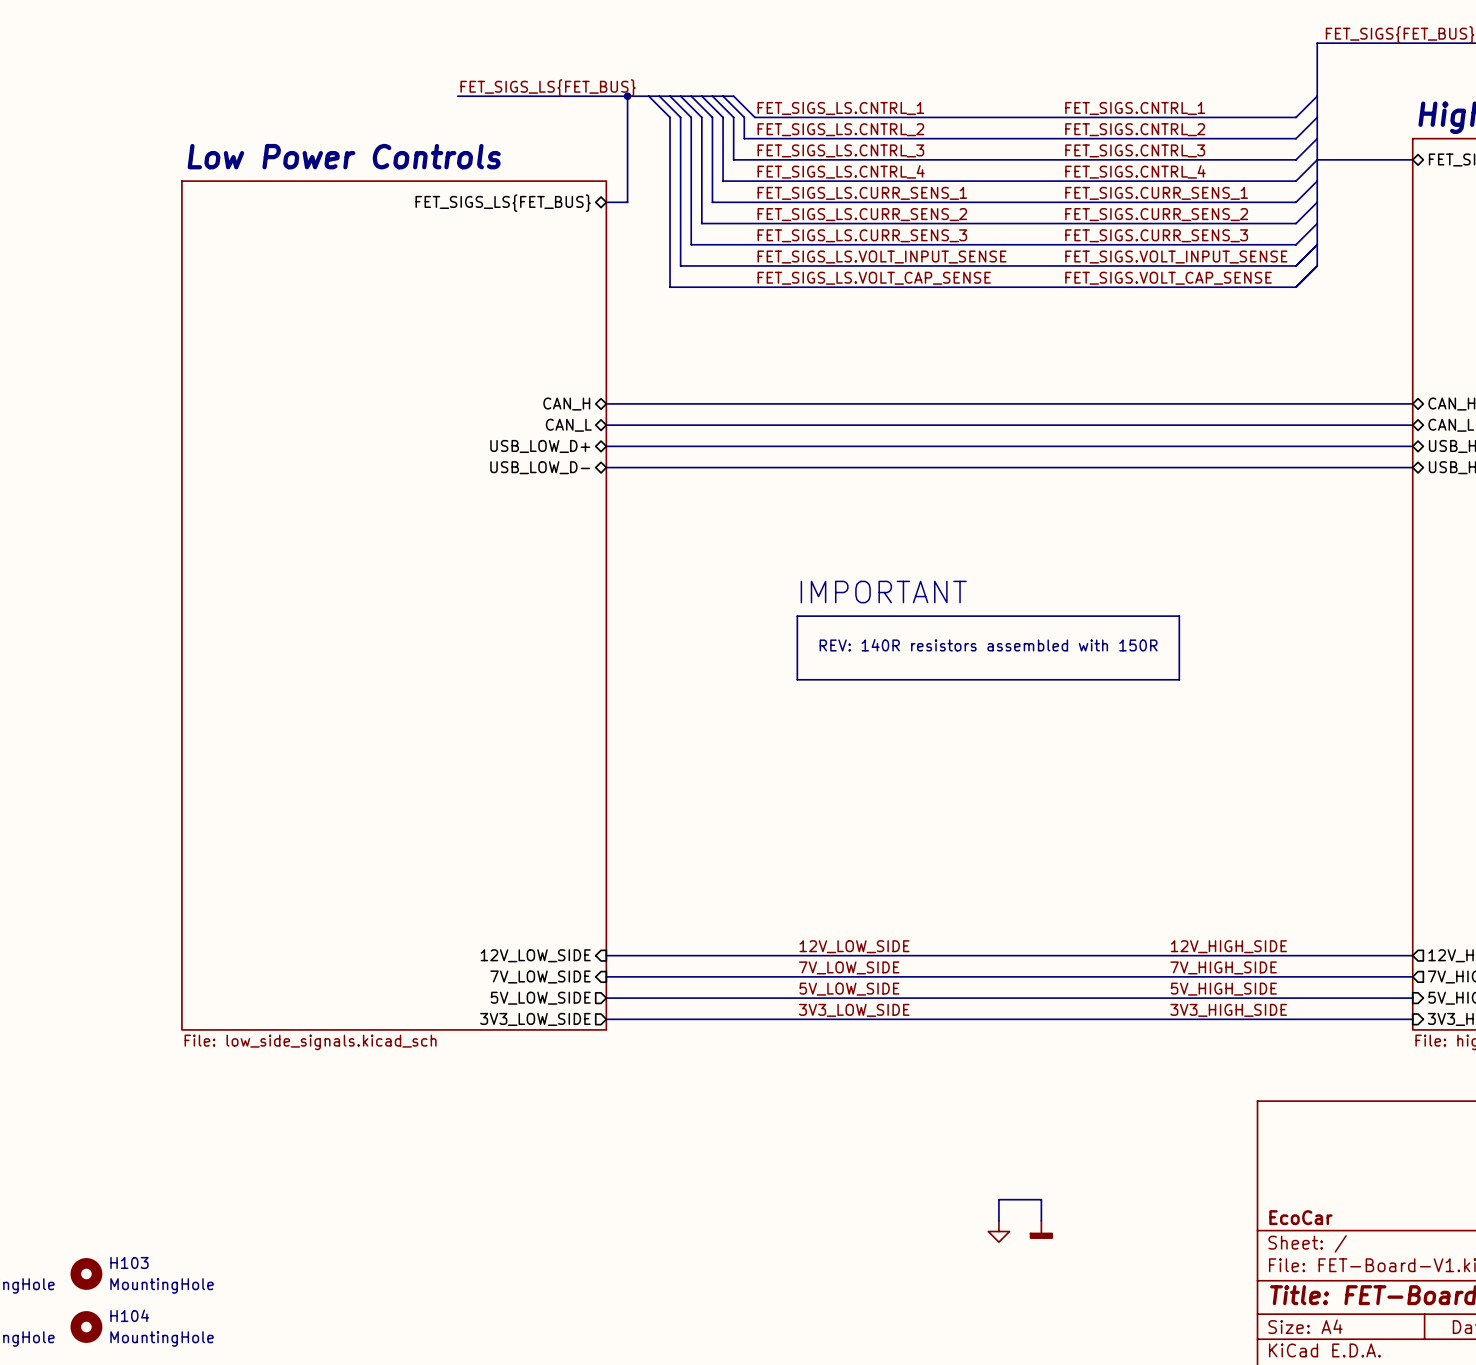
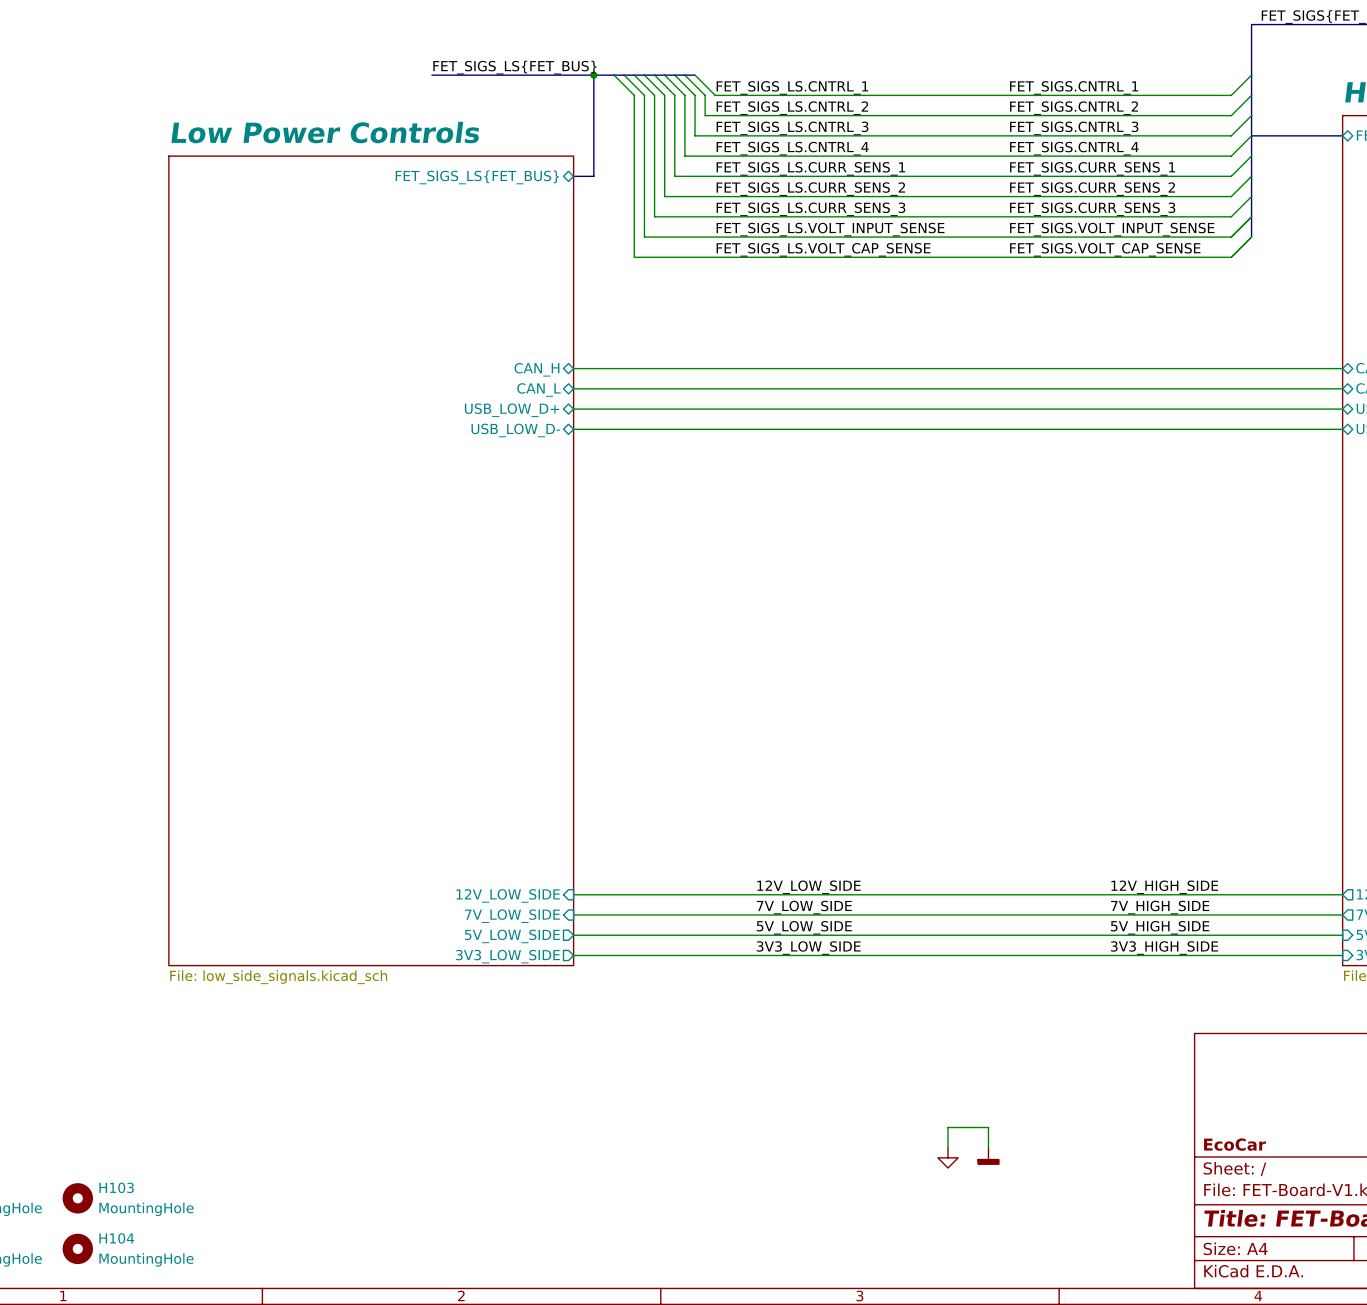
text: IMPORTANT (883, 592) -> none
line: (797, 616) (1179, 616) (1179, 679) (797, 679) (797, 616) -> none
text: REV: 140R resistors assembled with 150R (988, 645) -> none

